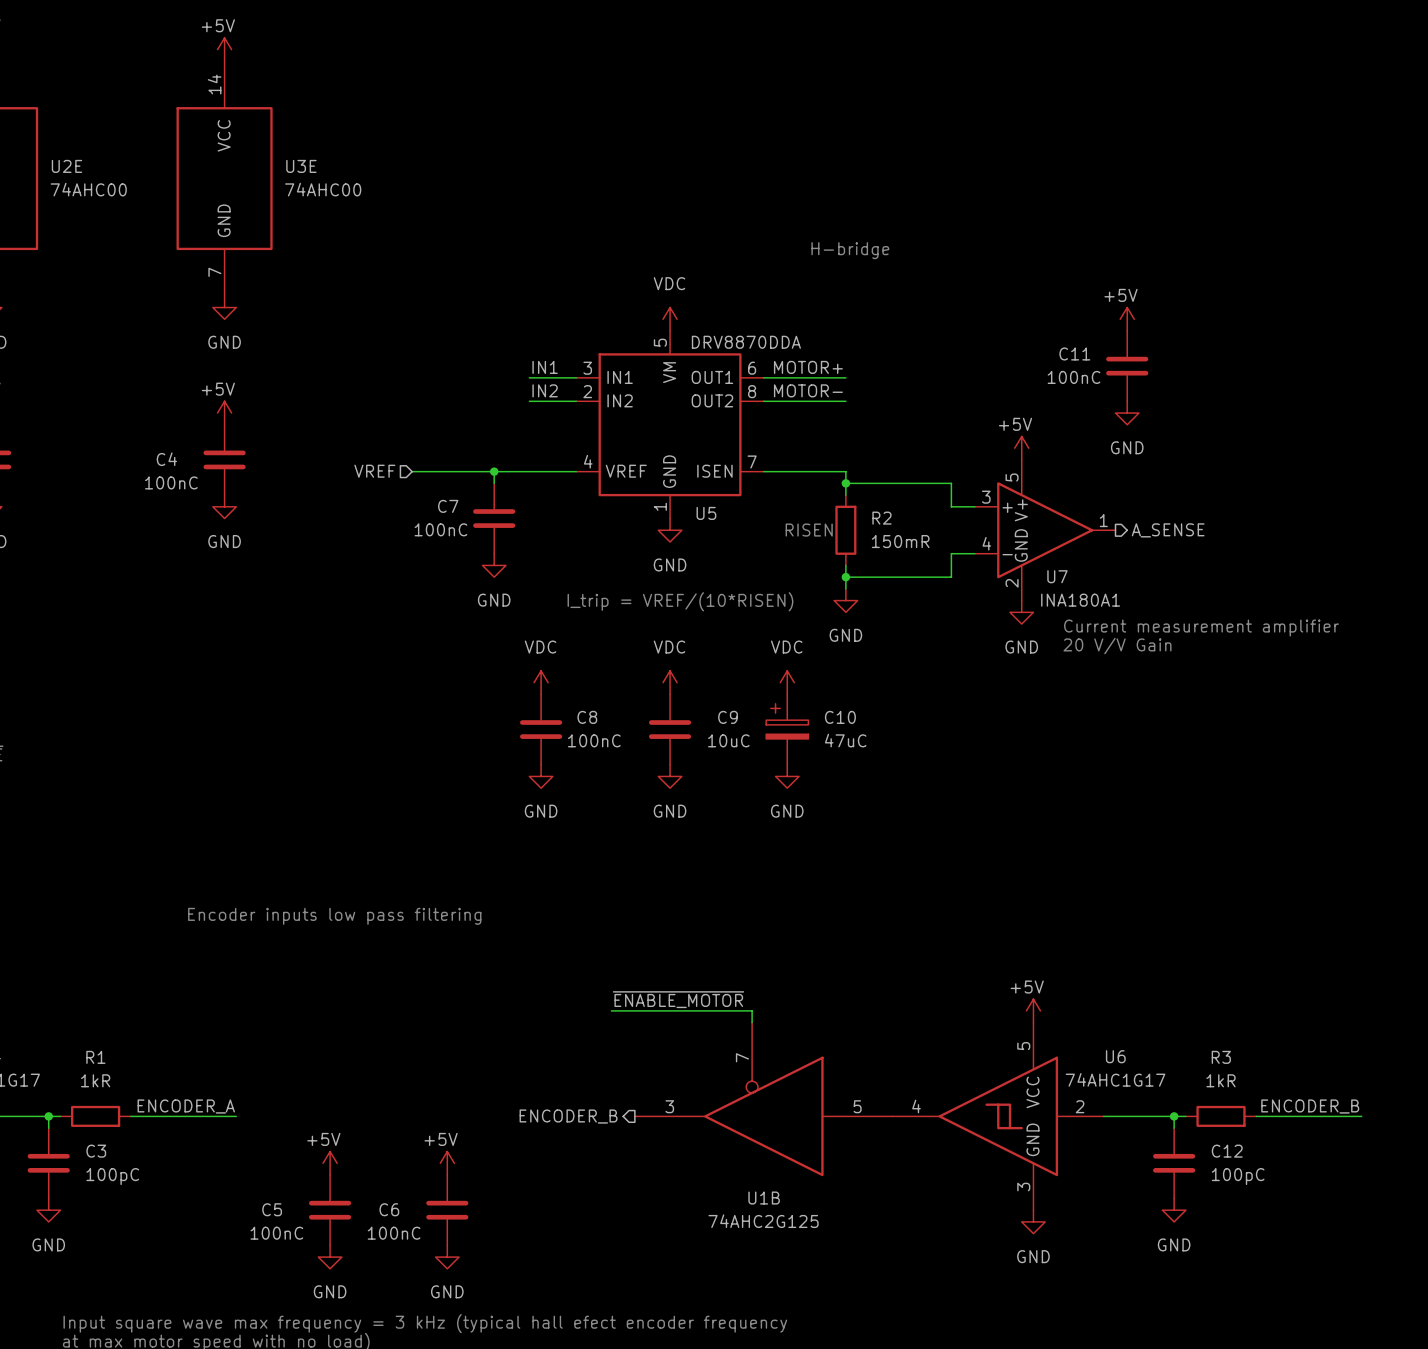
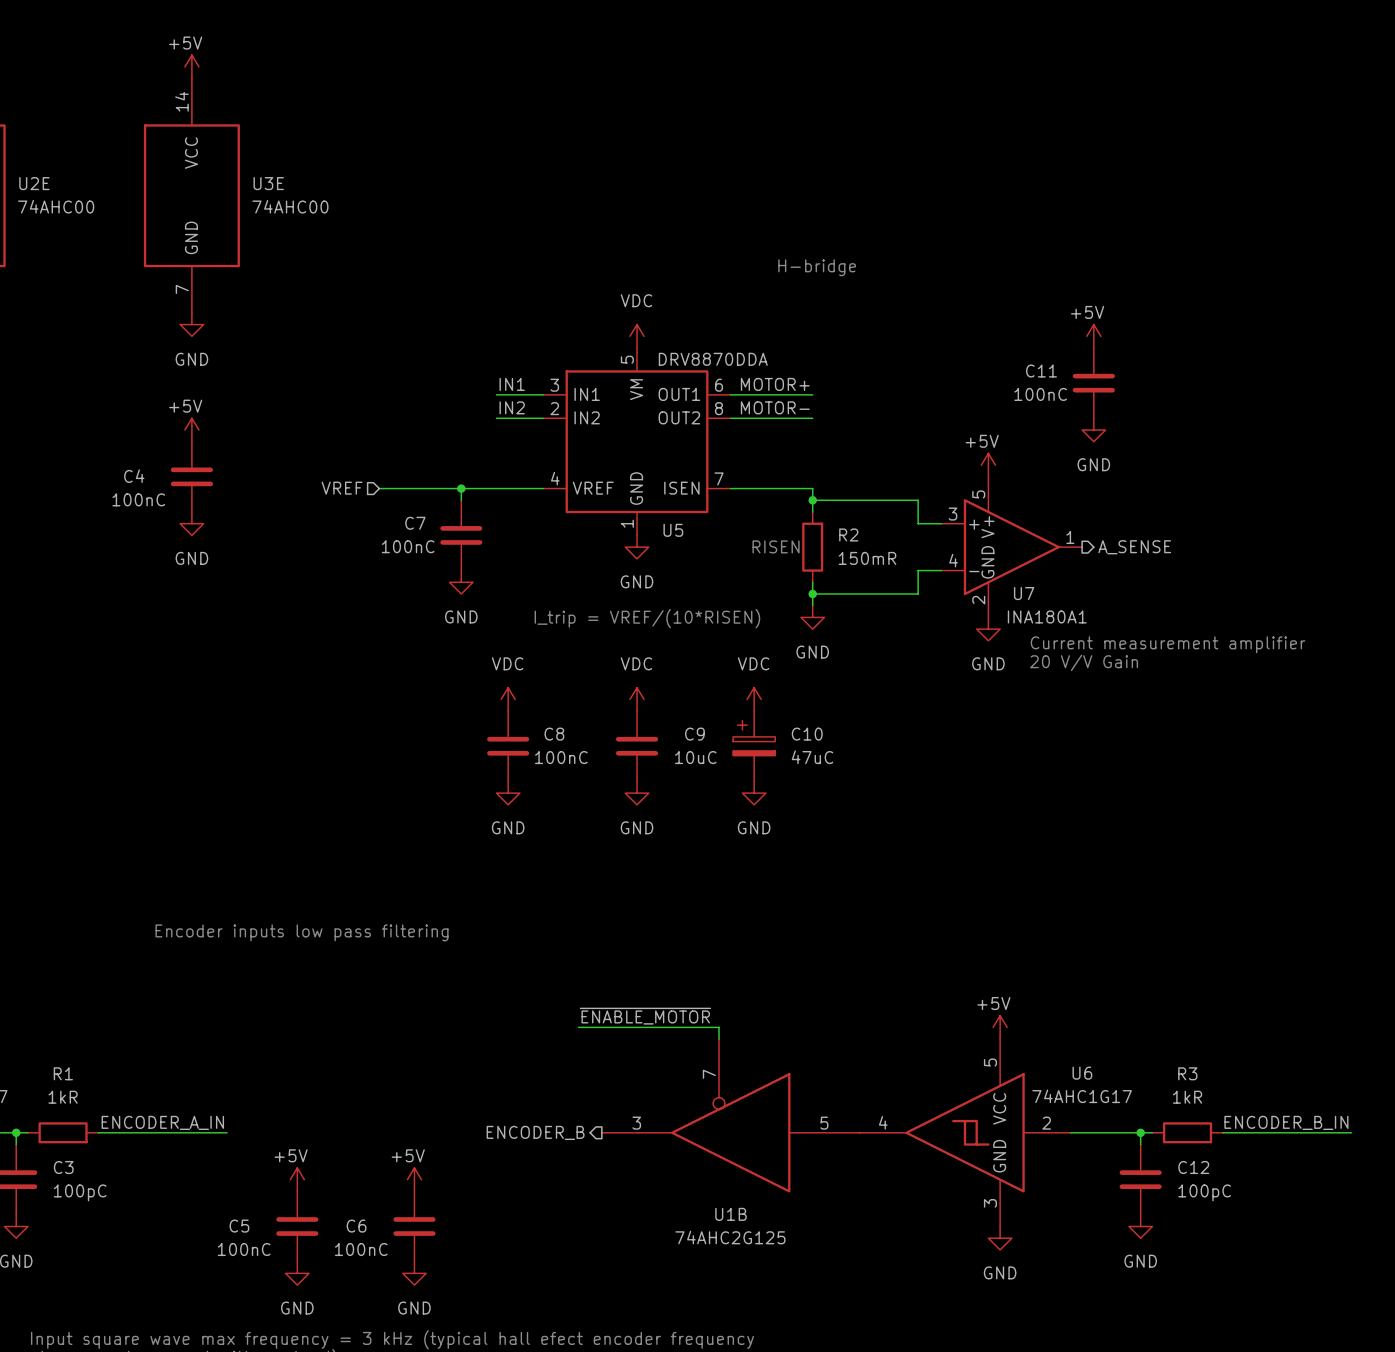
label: ENCODER_A (186, 1106) -> ENCODER_A_IN (162, 1122)
label: ENCODER_B (1310, 1106) -> ENCODER_B_IN (1286, 1122)
wire: none -> (203, 1132) (227, 1132)
wire: none -> (1328, 1132) (1351, 1132)

